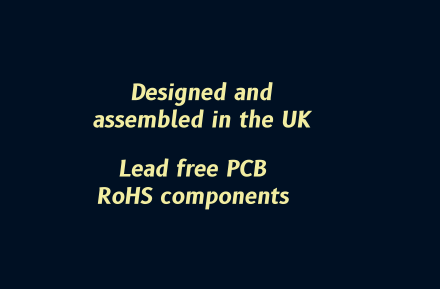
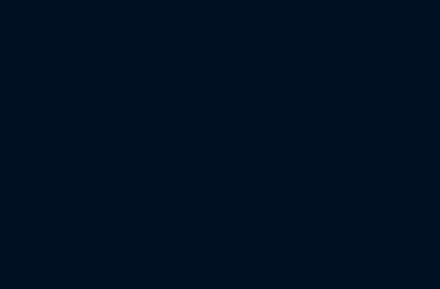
text: Designed and (202, 93) -> none
text: assembled in the UK (202, 118) -> none
text: Lead free PCB (192, 167) -> none
text: RoHS components (193, 198) -> none

